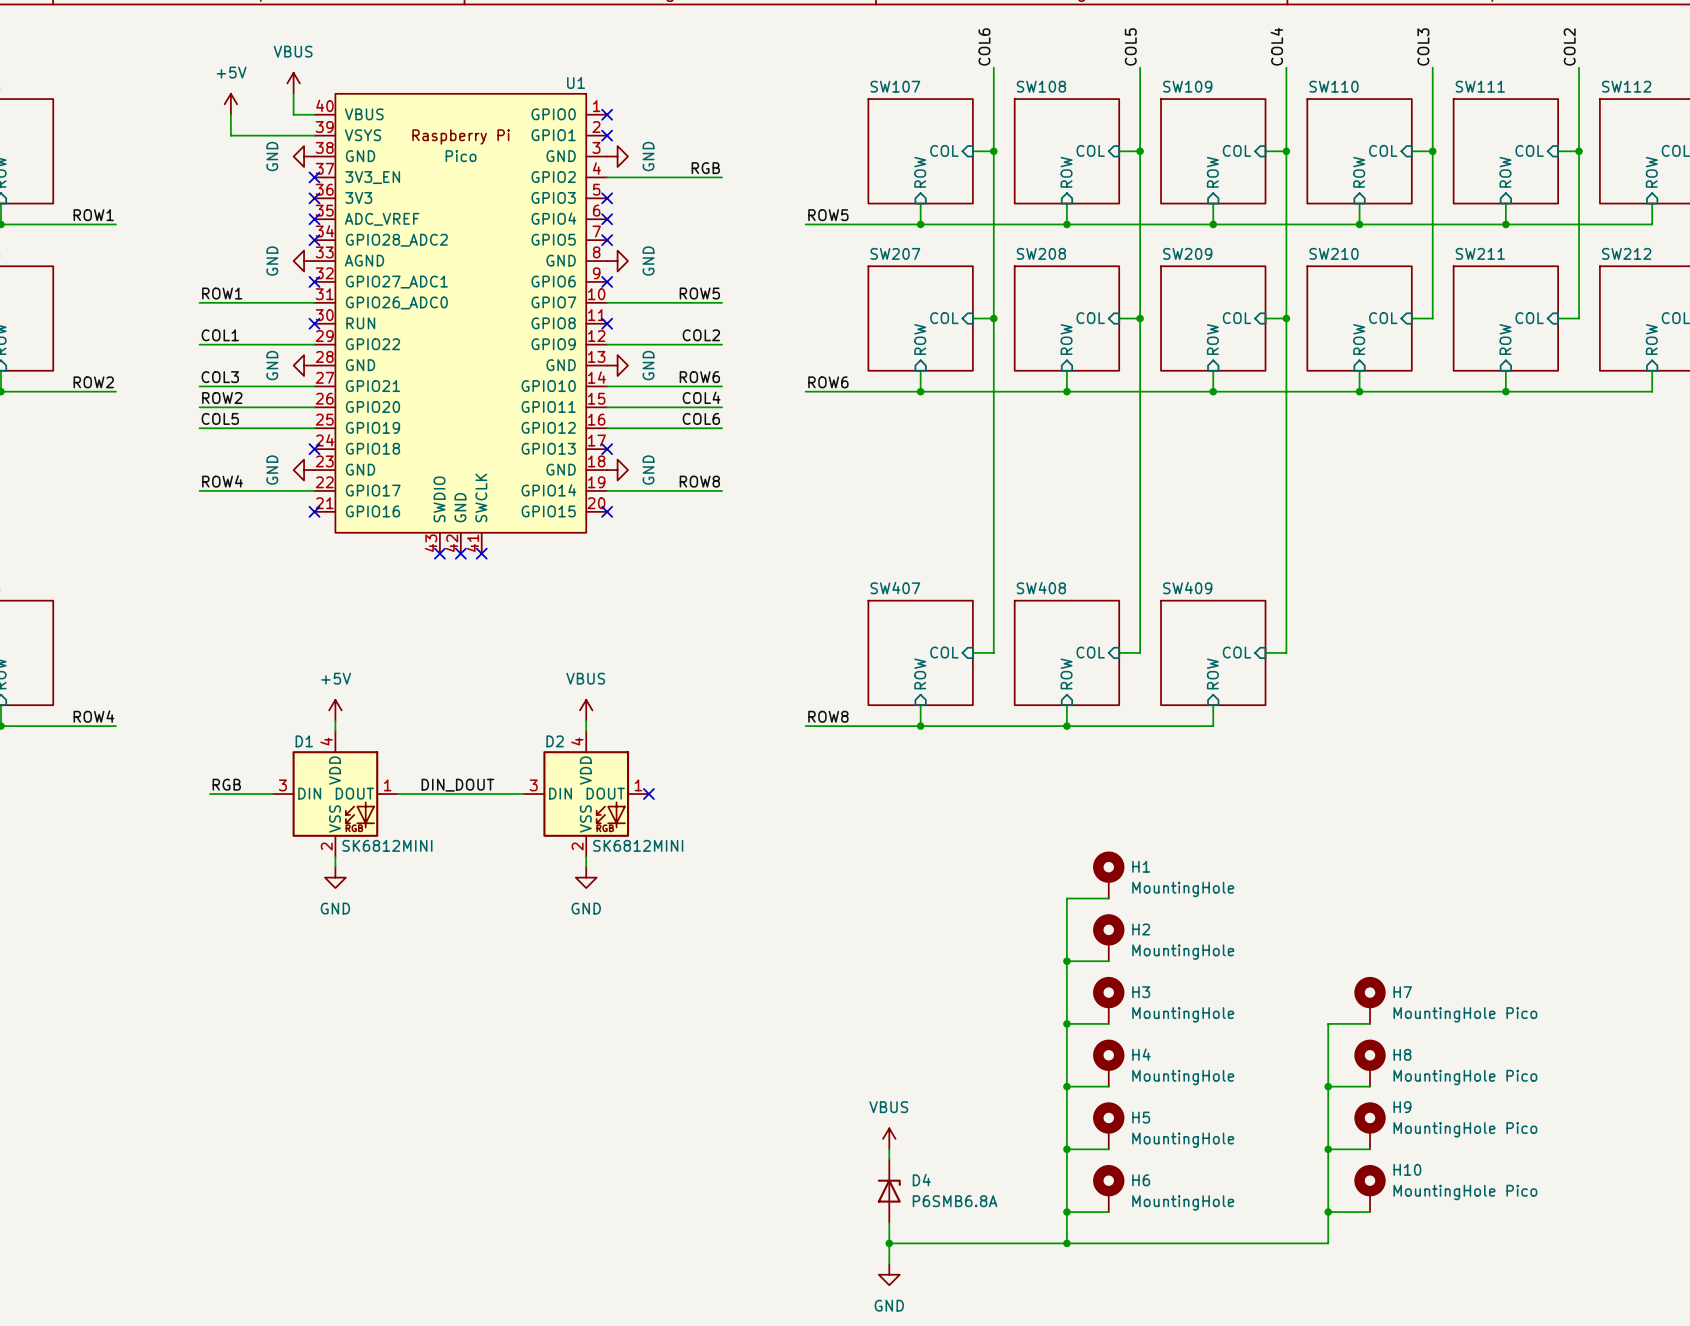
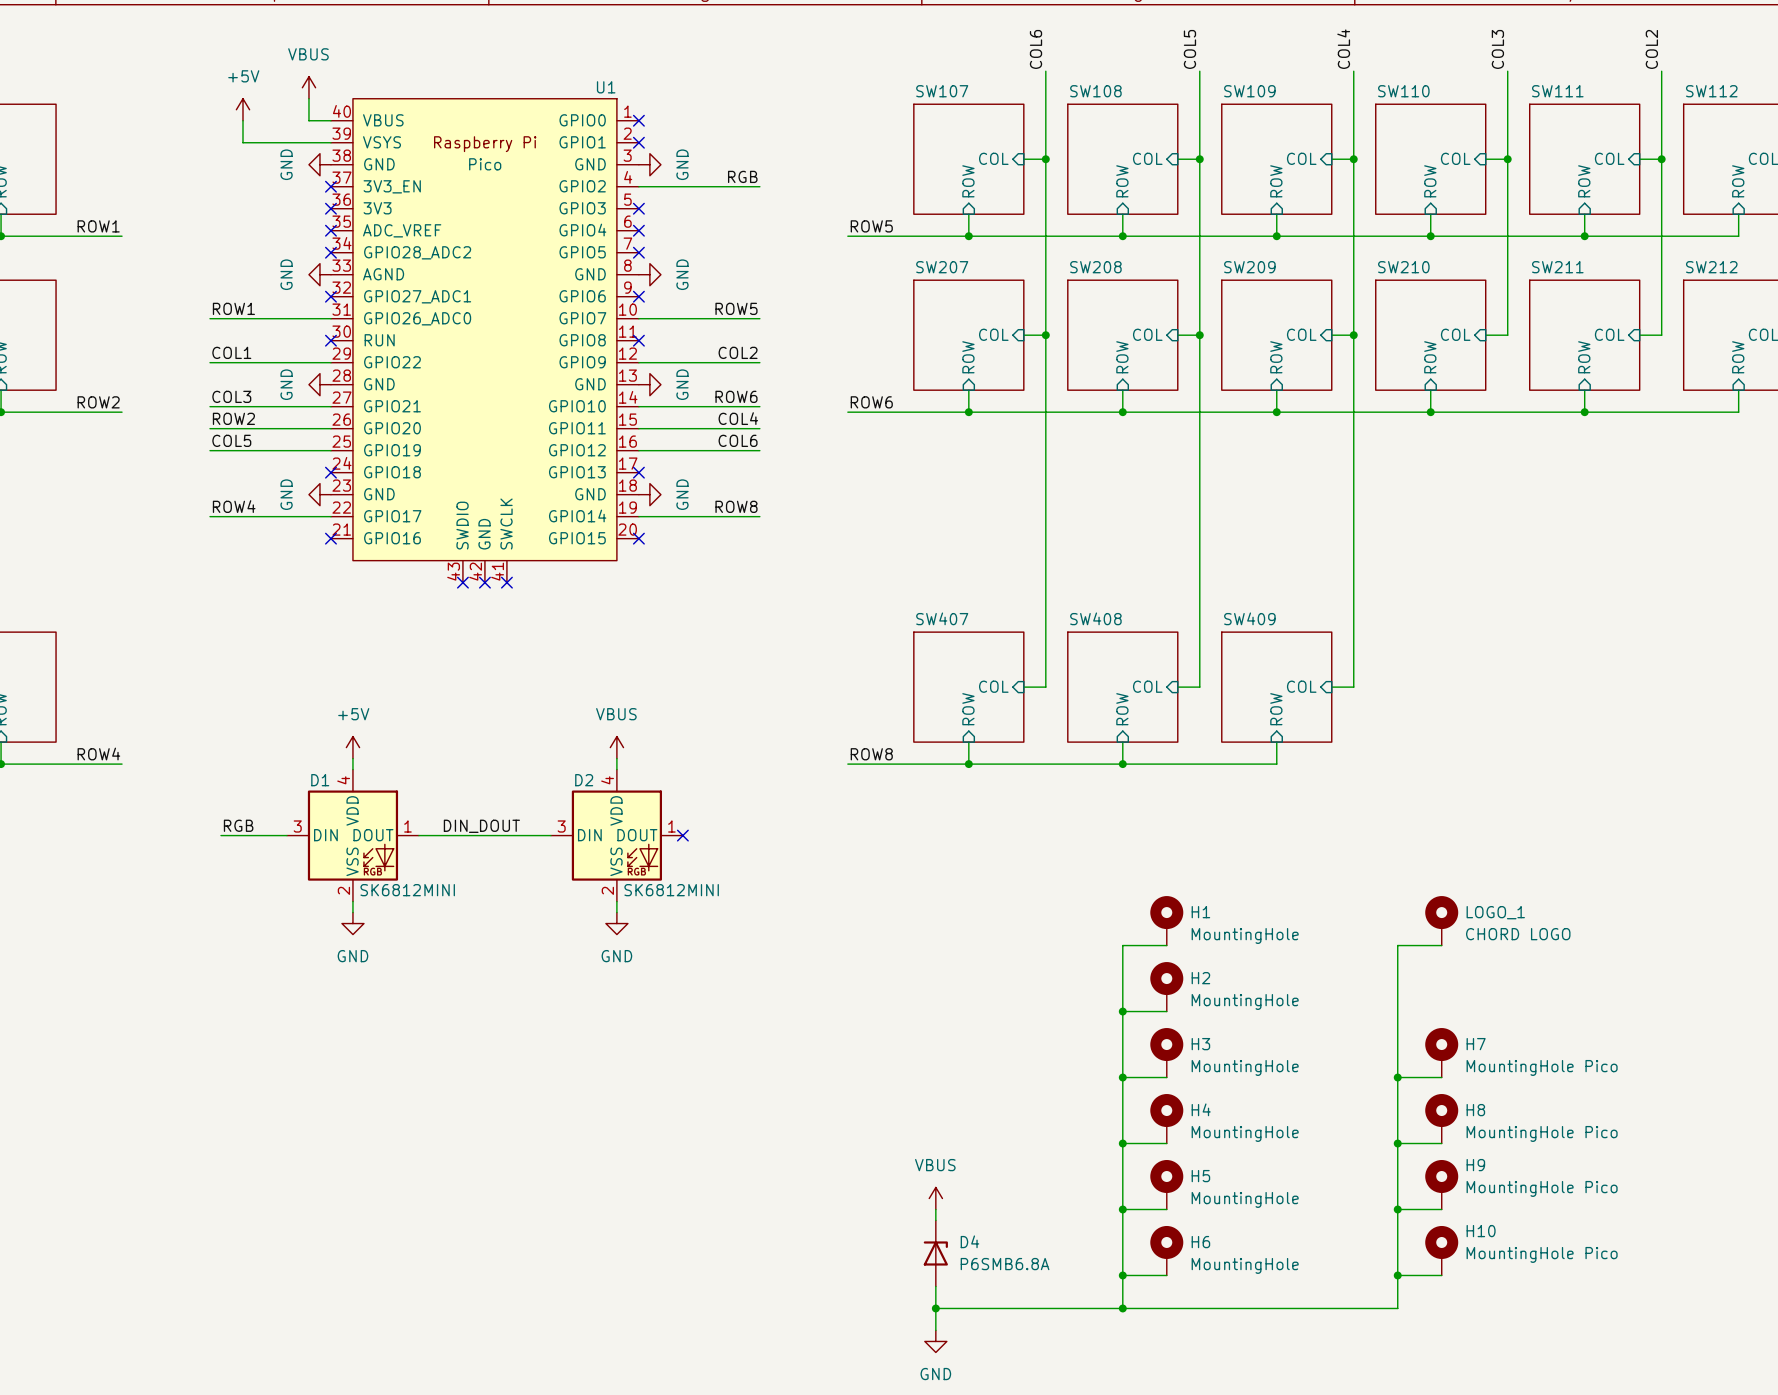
LOGO_1: none -> CHORD LOGO (1441, 920)
wire: none -> (1441, 945) (1397, 945) (1397, 1077)
junction: none -> (1397, 1077)

